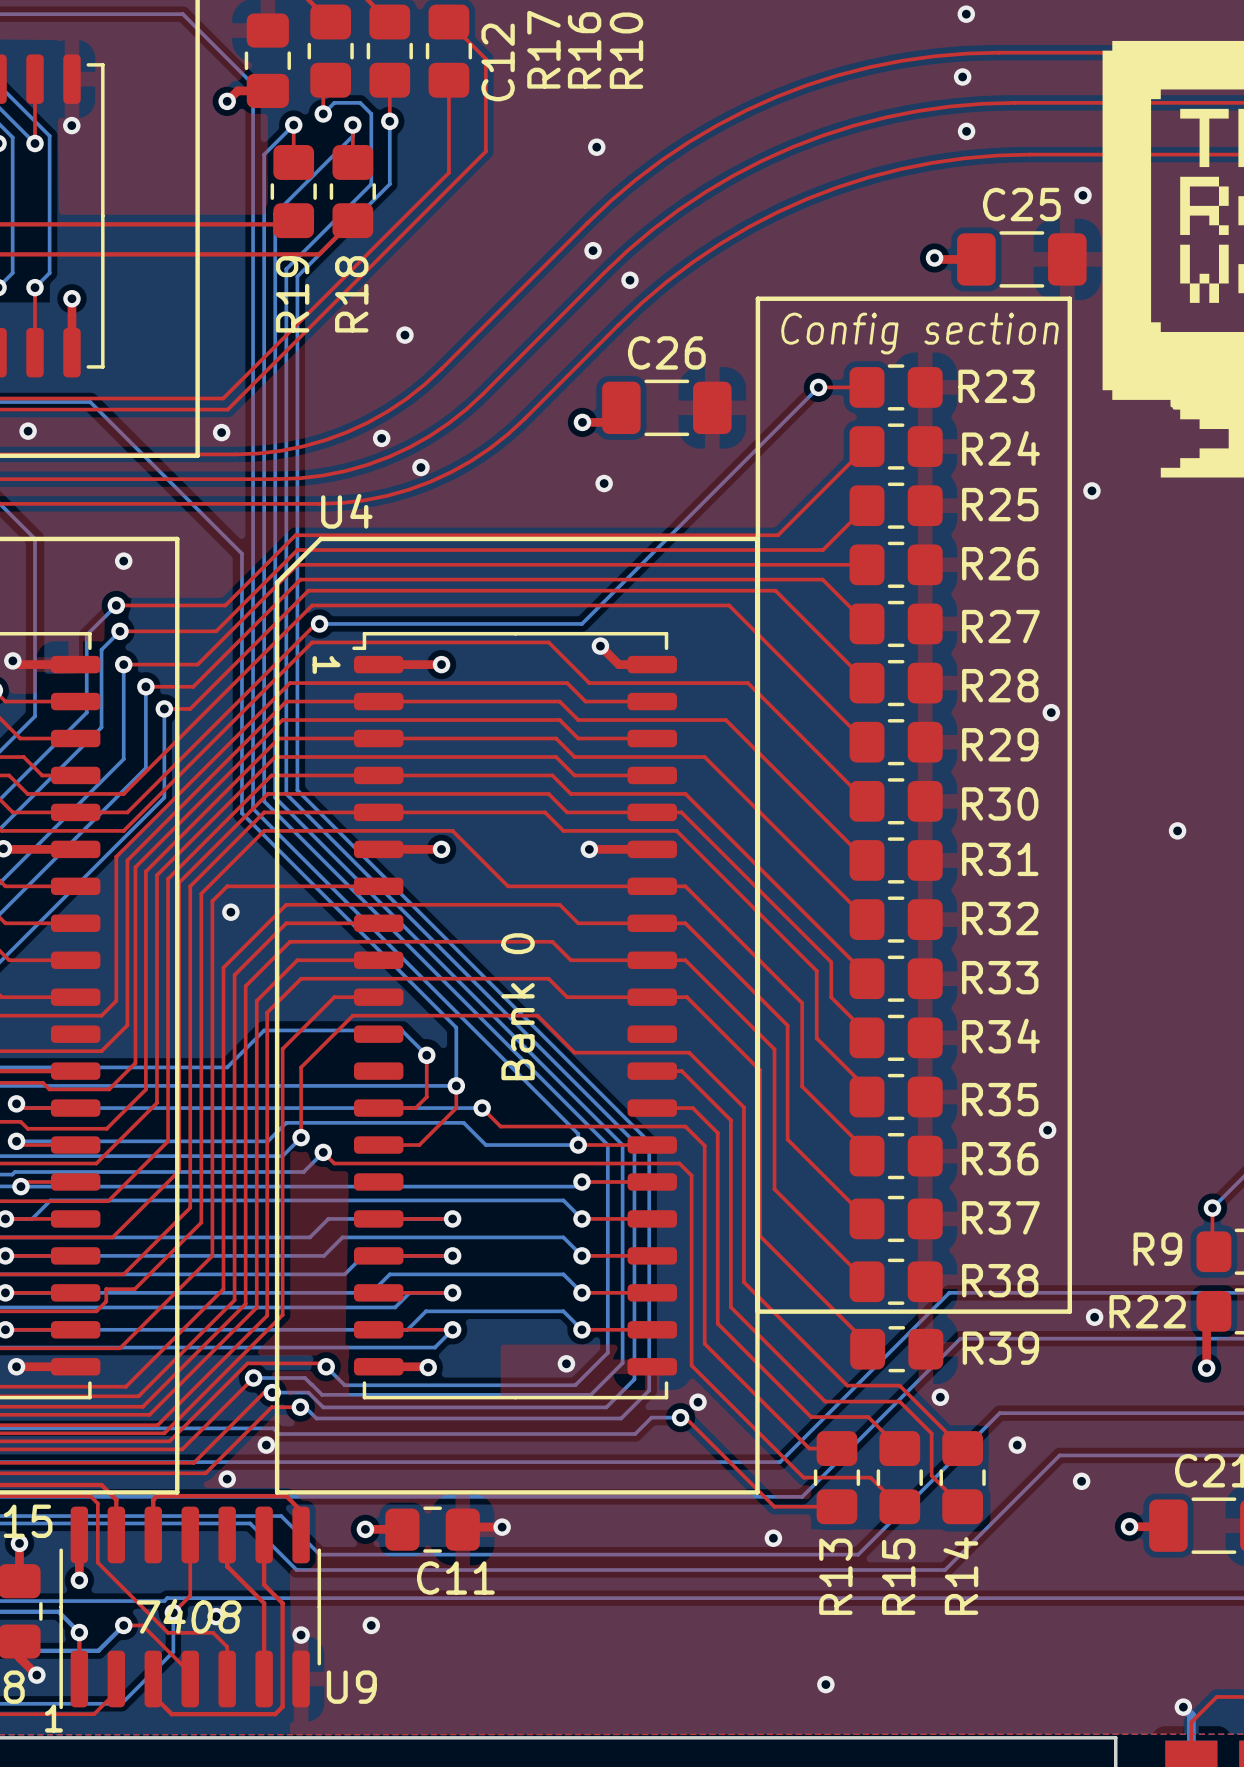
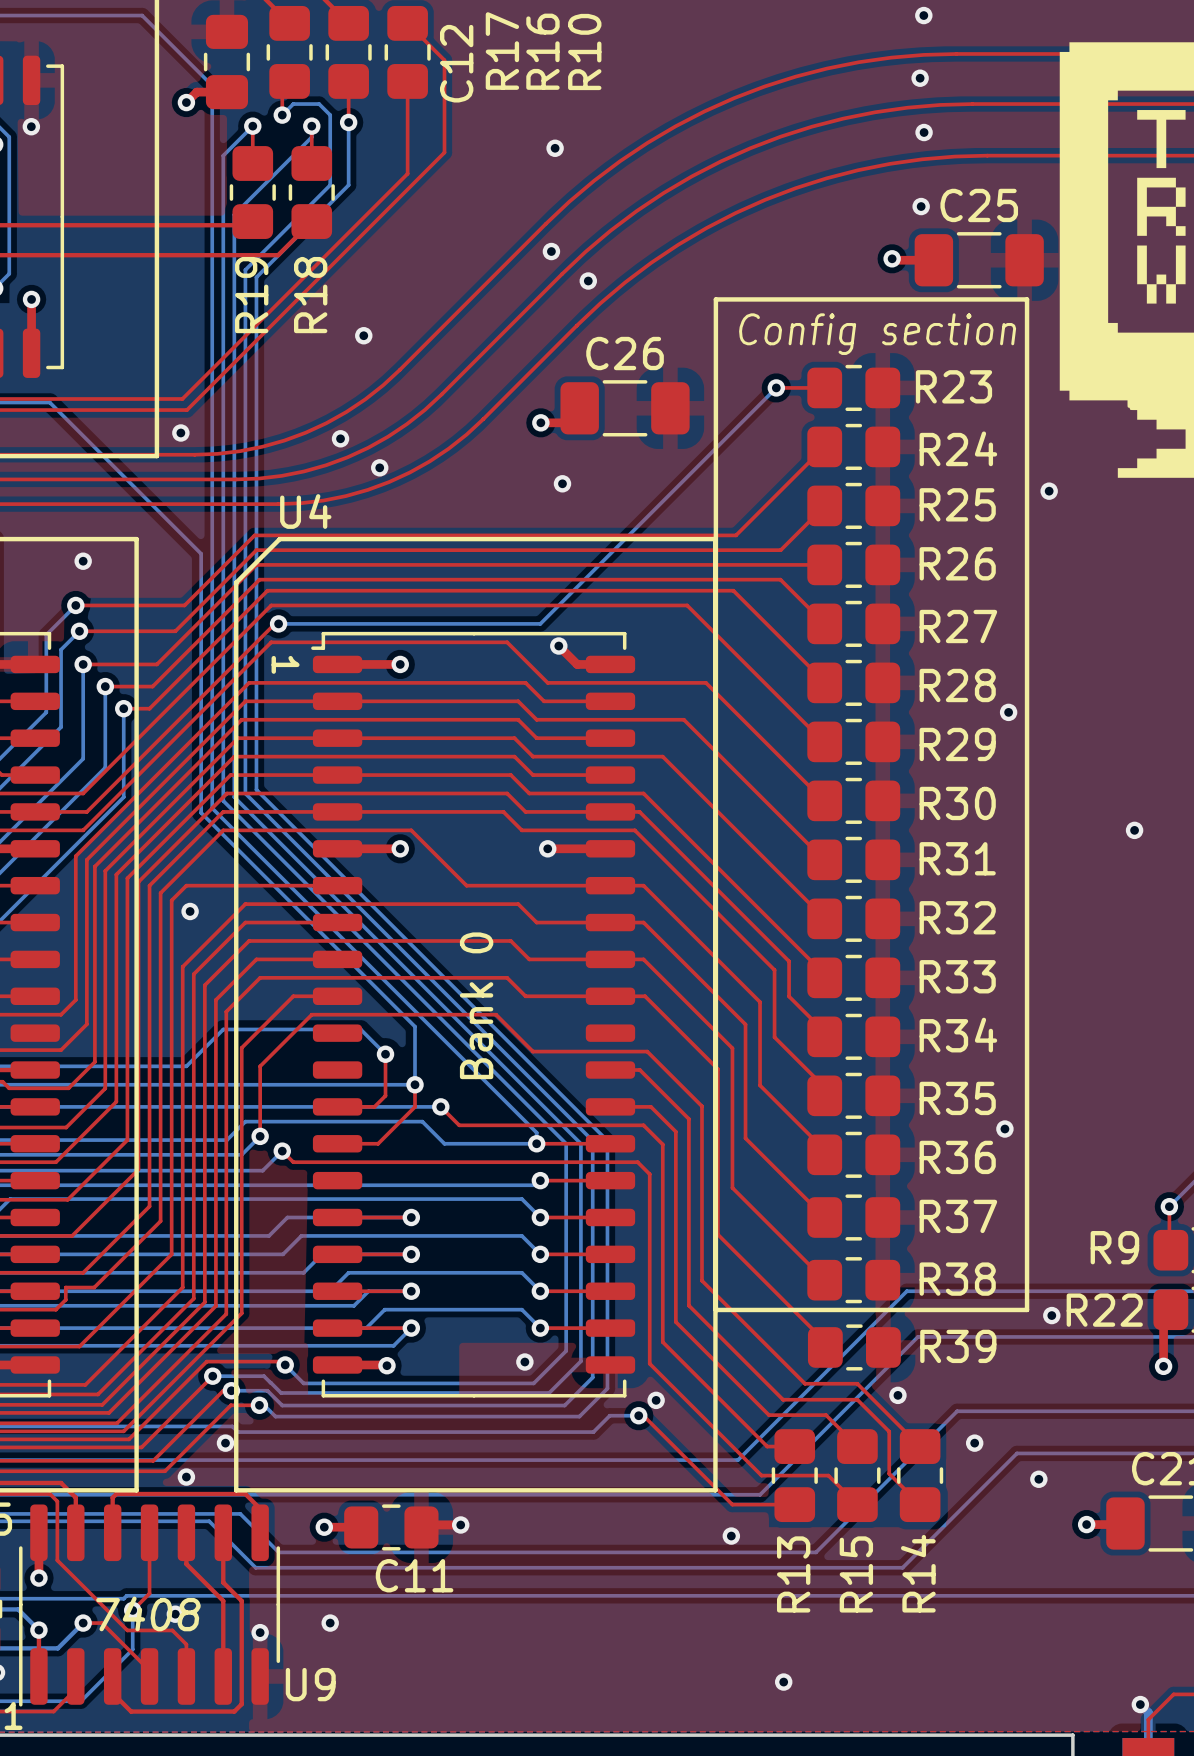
via position: (1082, 195) -> (921, 206)

